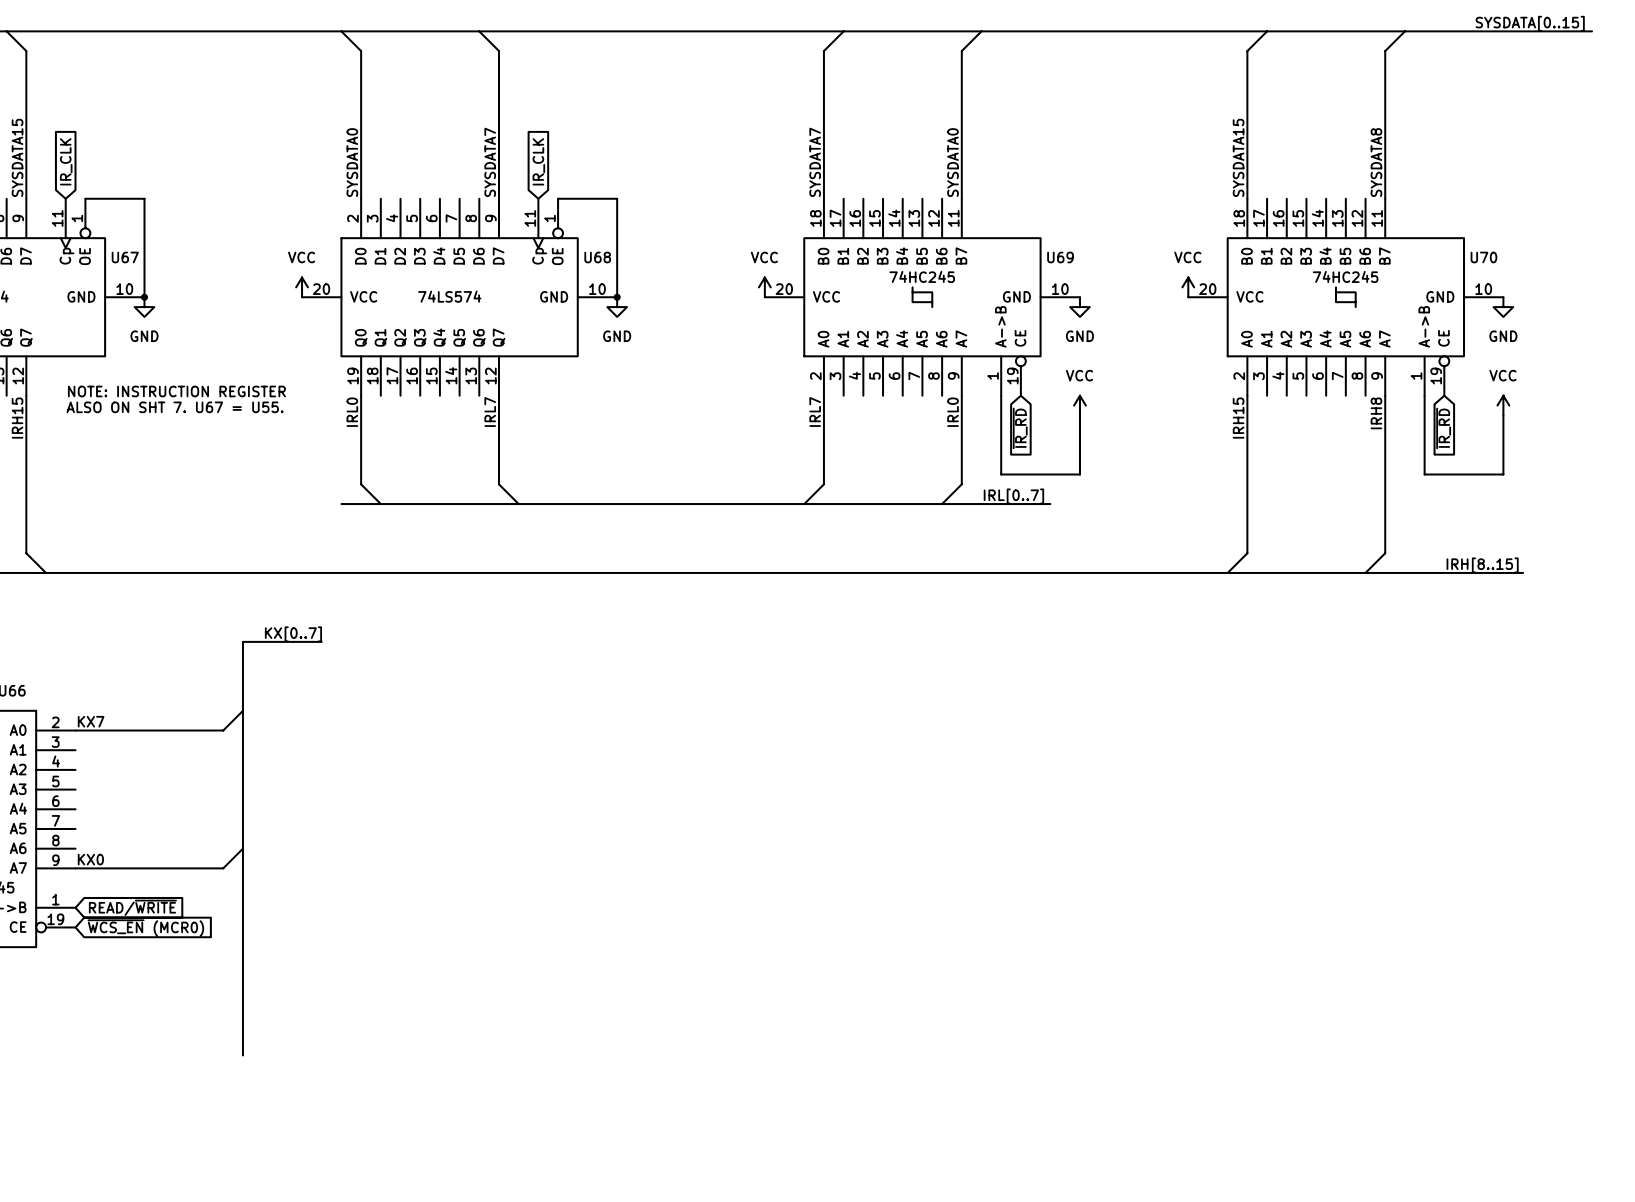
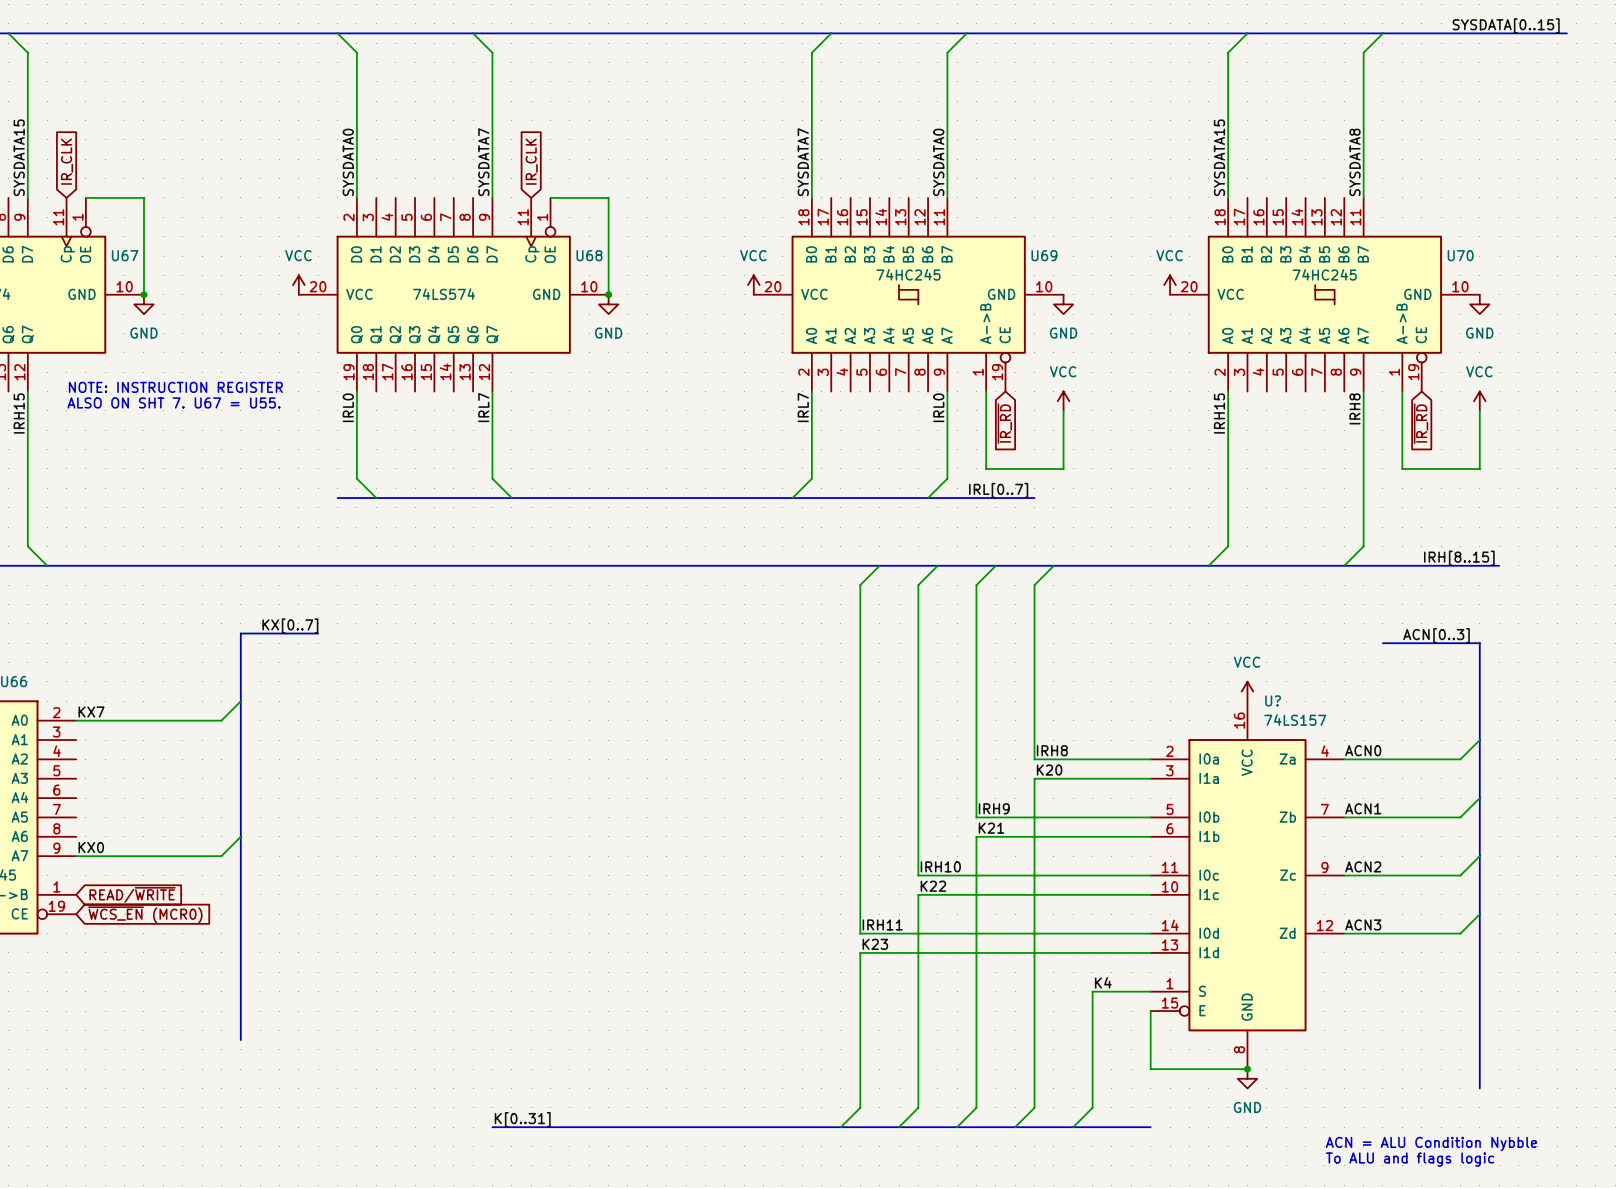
wire: none -> (879, 565) (860, 585) (860, 933) (1150, 933)
wire: none -> (937, 565) (918, 585) (918, 875) (1150, 875)
wire: none -> (995, 565) (976, 585) (976, 817) (1150, 817)
wire: none -> (1053, 565) (1034, 585) (1034, 759) (1150, 759)
label: none -> ACN[0..3] (1436, 635)
bus: none -> (1382, 643) (1479, 643) (1479, 1088)
power symbol: none -> VCC (1247, 691)
wire: none -> (1479, 740) (1460, 759) (1344, 759)
label: none -> IRH8 (1052, 750)
label: none -> ACN0 (1363, 750)
label: none -> K20 (1049, 770)
wire: none -> (1150, 778) (1034, 778) (1034, 1107) (1015, 1127)
wire: none -> (1479, 798) (1460, 817) (1344, 817)
label: none -> IRH9 (994, 808)
label: none -> ACN1 (1363, 808)
label: none -> K21 (991, 828)
wire: none -> (1150, 836) (976, 836) (976, 1107) (957, 1127)
wire: none -> (1479, 856) (1460, 875) (1344, 875)
label: none -> IRH10 (940, 866)
label: none -> ACN2 (1363, 866)
U?: none -> 74LS157 (1247, 885)
label: none -> K22 (933, 886)
wire: none -> (1150, 894) (918, 894) (918, 1107) (899, 1127)
wire: none -> (1479, 914) (1460, 933) (1344, 933)
label: none -> IRH11 (882, 924)
label: none -> ACN3 (1363, 924)
label: none -> K23 (875, 944)
wire: none -> (1150, 952) (860, 952) (860, 1107) (840, 1127)
label: none -> K4 (1103, 982)
wire: none -> (1150, 991) (1092, 991) (1092, 1107) (1073, 1127)
wire: none -> (1150, 1011) (1150, 1069) (1247, 1069)
junction: none -> (1247, 1069)
power symbol: none -> GND (1247, 1078)
label: none -> K[0..31] (522, 1119)
bus: none -> (492, 1127) (1150, 1127)
text: none -> ACN = ALU Condition Nybble (1431, 1144)
text: none -> To ALU and flags logic (1410, 1159)

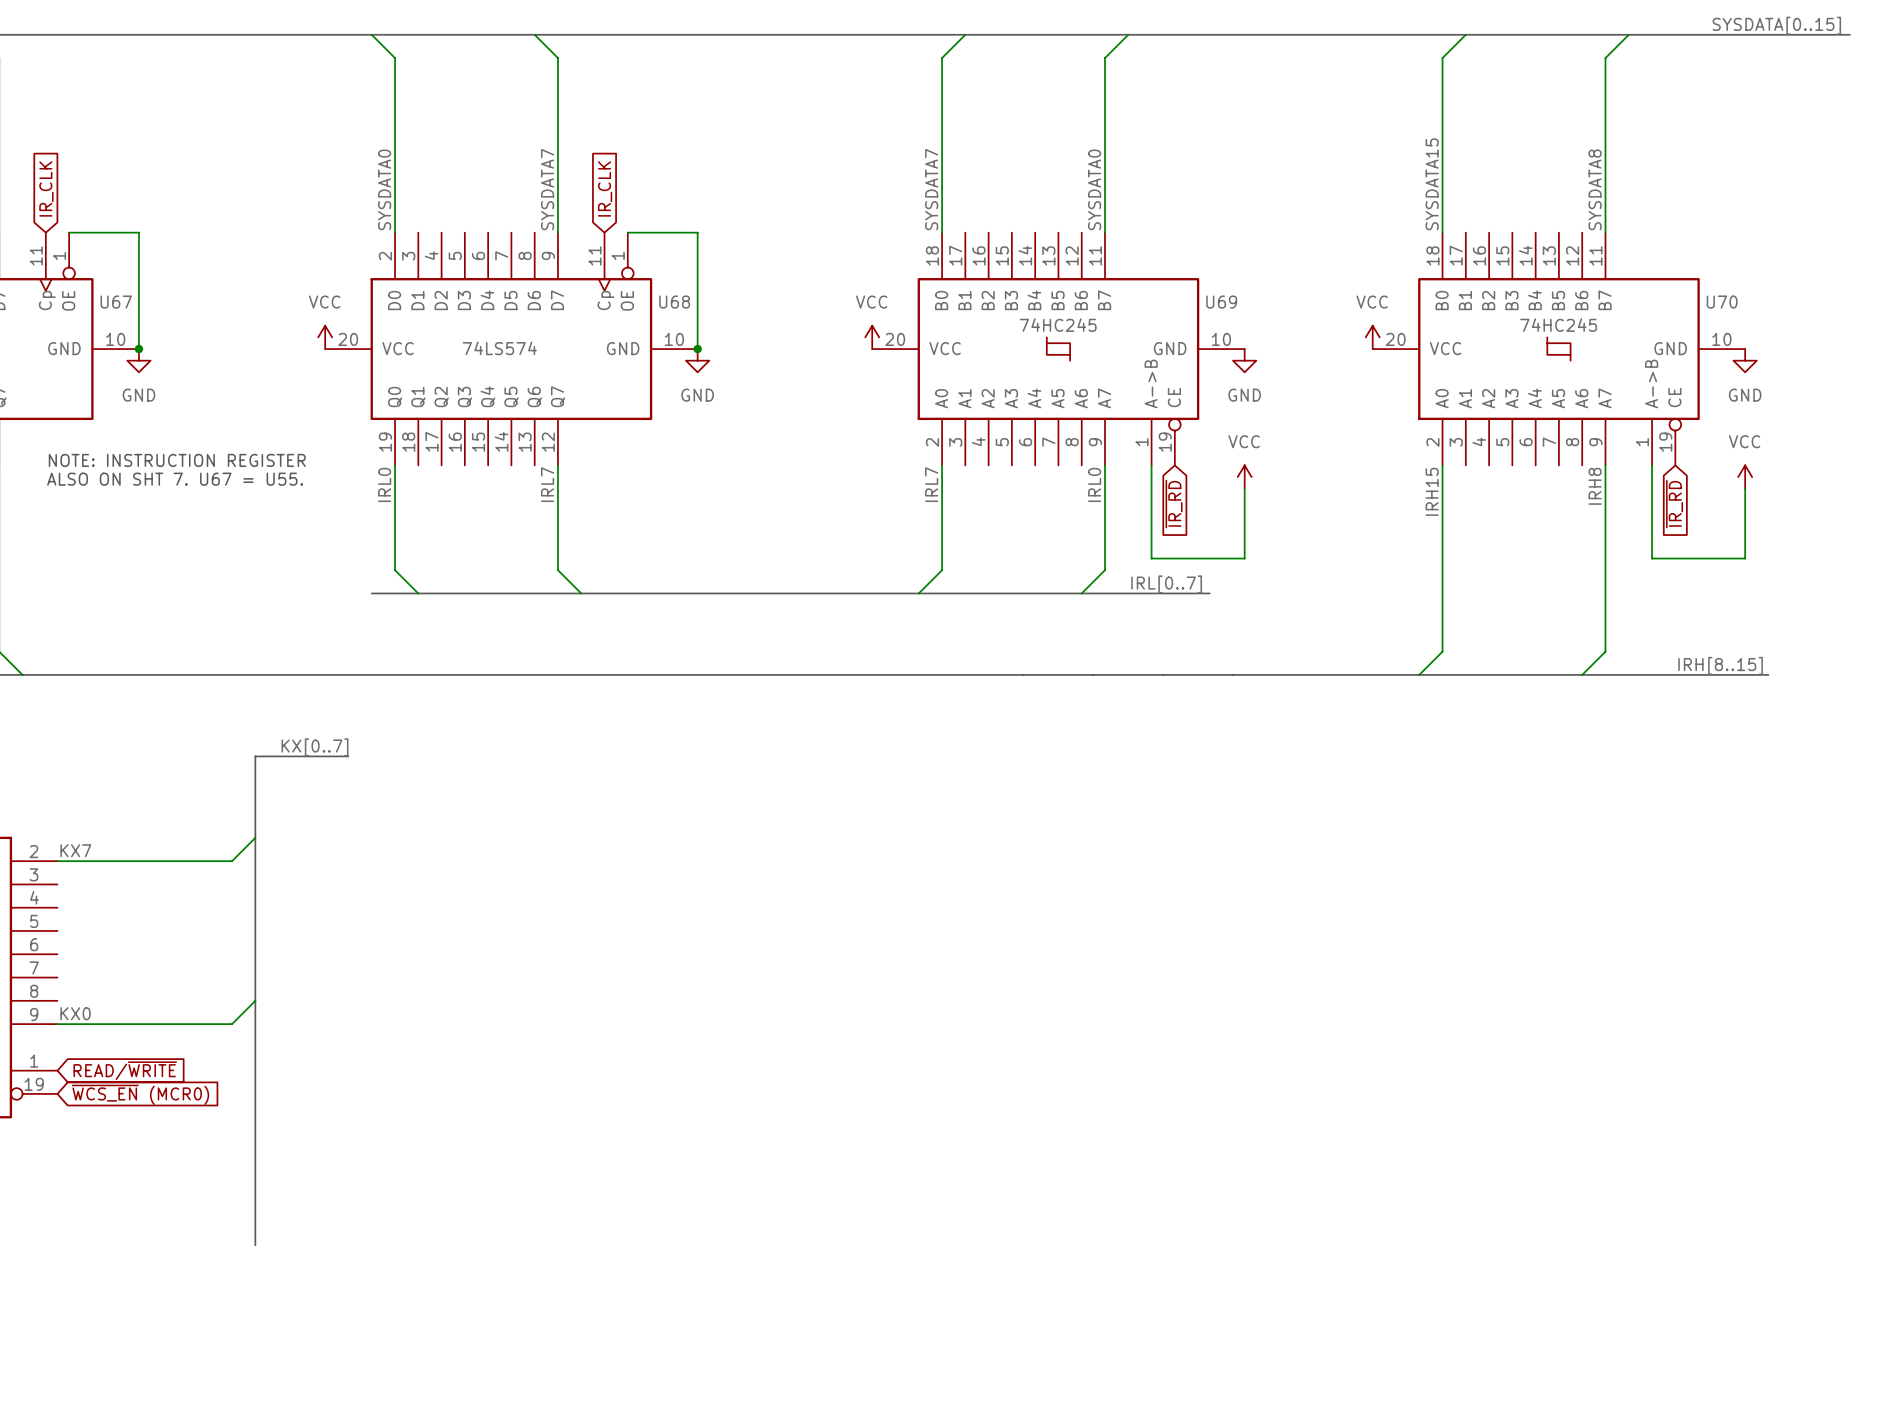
wire: (879, 565) (860, 585) (860, 933) (1150, 933) -> none
wire: (937, 565) (918, 585) (918, 875) (1150, 875) -> none
wire: (995, 565) (976, 585) (976, 817) (1150, 817) -> none
wire: (1053, 565) (1034, 585) (1034, 759) (1150, 759) -> none
label: ACN[0..3] (1436, 635) -> none
bus: (1382, 643) (1479, 643) (1479, 1088) -> none
power symbol: VCC (1247, 691) -> none
wire: (1479, 740) (1460, 759) (1344, 759) -> none
label: IRH8 (1052, 750) -> none
label: ACN0 (1363, 750) -> none
label: K20 (1049, 770) -> none
wire: (1150, 778) (1034, 778) (1034, 1107) (1015, 1127) -> none
wire: (1479, 798) (1460, 817) (1344, 817) -> none
label: IRH9 (994, 808) -> none
label: ACN1 (1363, 808) -> none
label: K21 (991, 828) -> none
wire: (1150, 836) (976, 836) (976, 1107) (957, 1127) -> none
wire: (1479, 856) (1460, 875) (1344, 875) -> none
label: IRH10 (940, 866) -> none
label: ACN2 (1363, 866) -> none
U?: 74LS157 (1247, 885) -> none
label: K22 (933, 886) -> none
wire: (1150, 894) (918, 894) (918, 1107) (899, 1127) -> none
wire: (1479, 914) (1460, 933) (1344, 933) -> none
label: IRH11 (882, 924) -> none
label: ACN3 (1363, 924) -> none
label: K23 (875, 944) -> none
wire: (1150, 952) (860, 952) (860, 1107) (840, 1127) -> none
label: K4 (1103, 982) -> none
wire: (1150, 991) (1092, 991) (1092, 1107) (1073, 1127) -> none
wire: (1150, 1011) (1150, 1069) (1247, 1069) -> none
junction: (1247, 1069) -> none
power symbol: GND (1247, 1078) -> none
label: K[0..31] (522, 1119) -> none
bus: (492, 1127) (1150, 1127) -> none
text: ACN = ALU Condition Nybble (1431, 1144) -> none
text: To ALU and flags logic (1410, 1159) -> none

